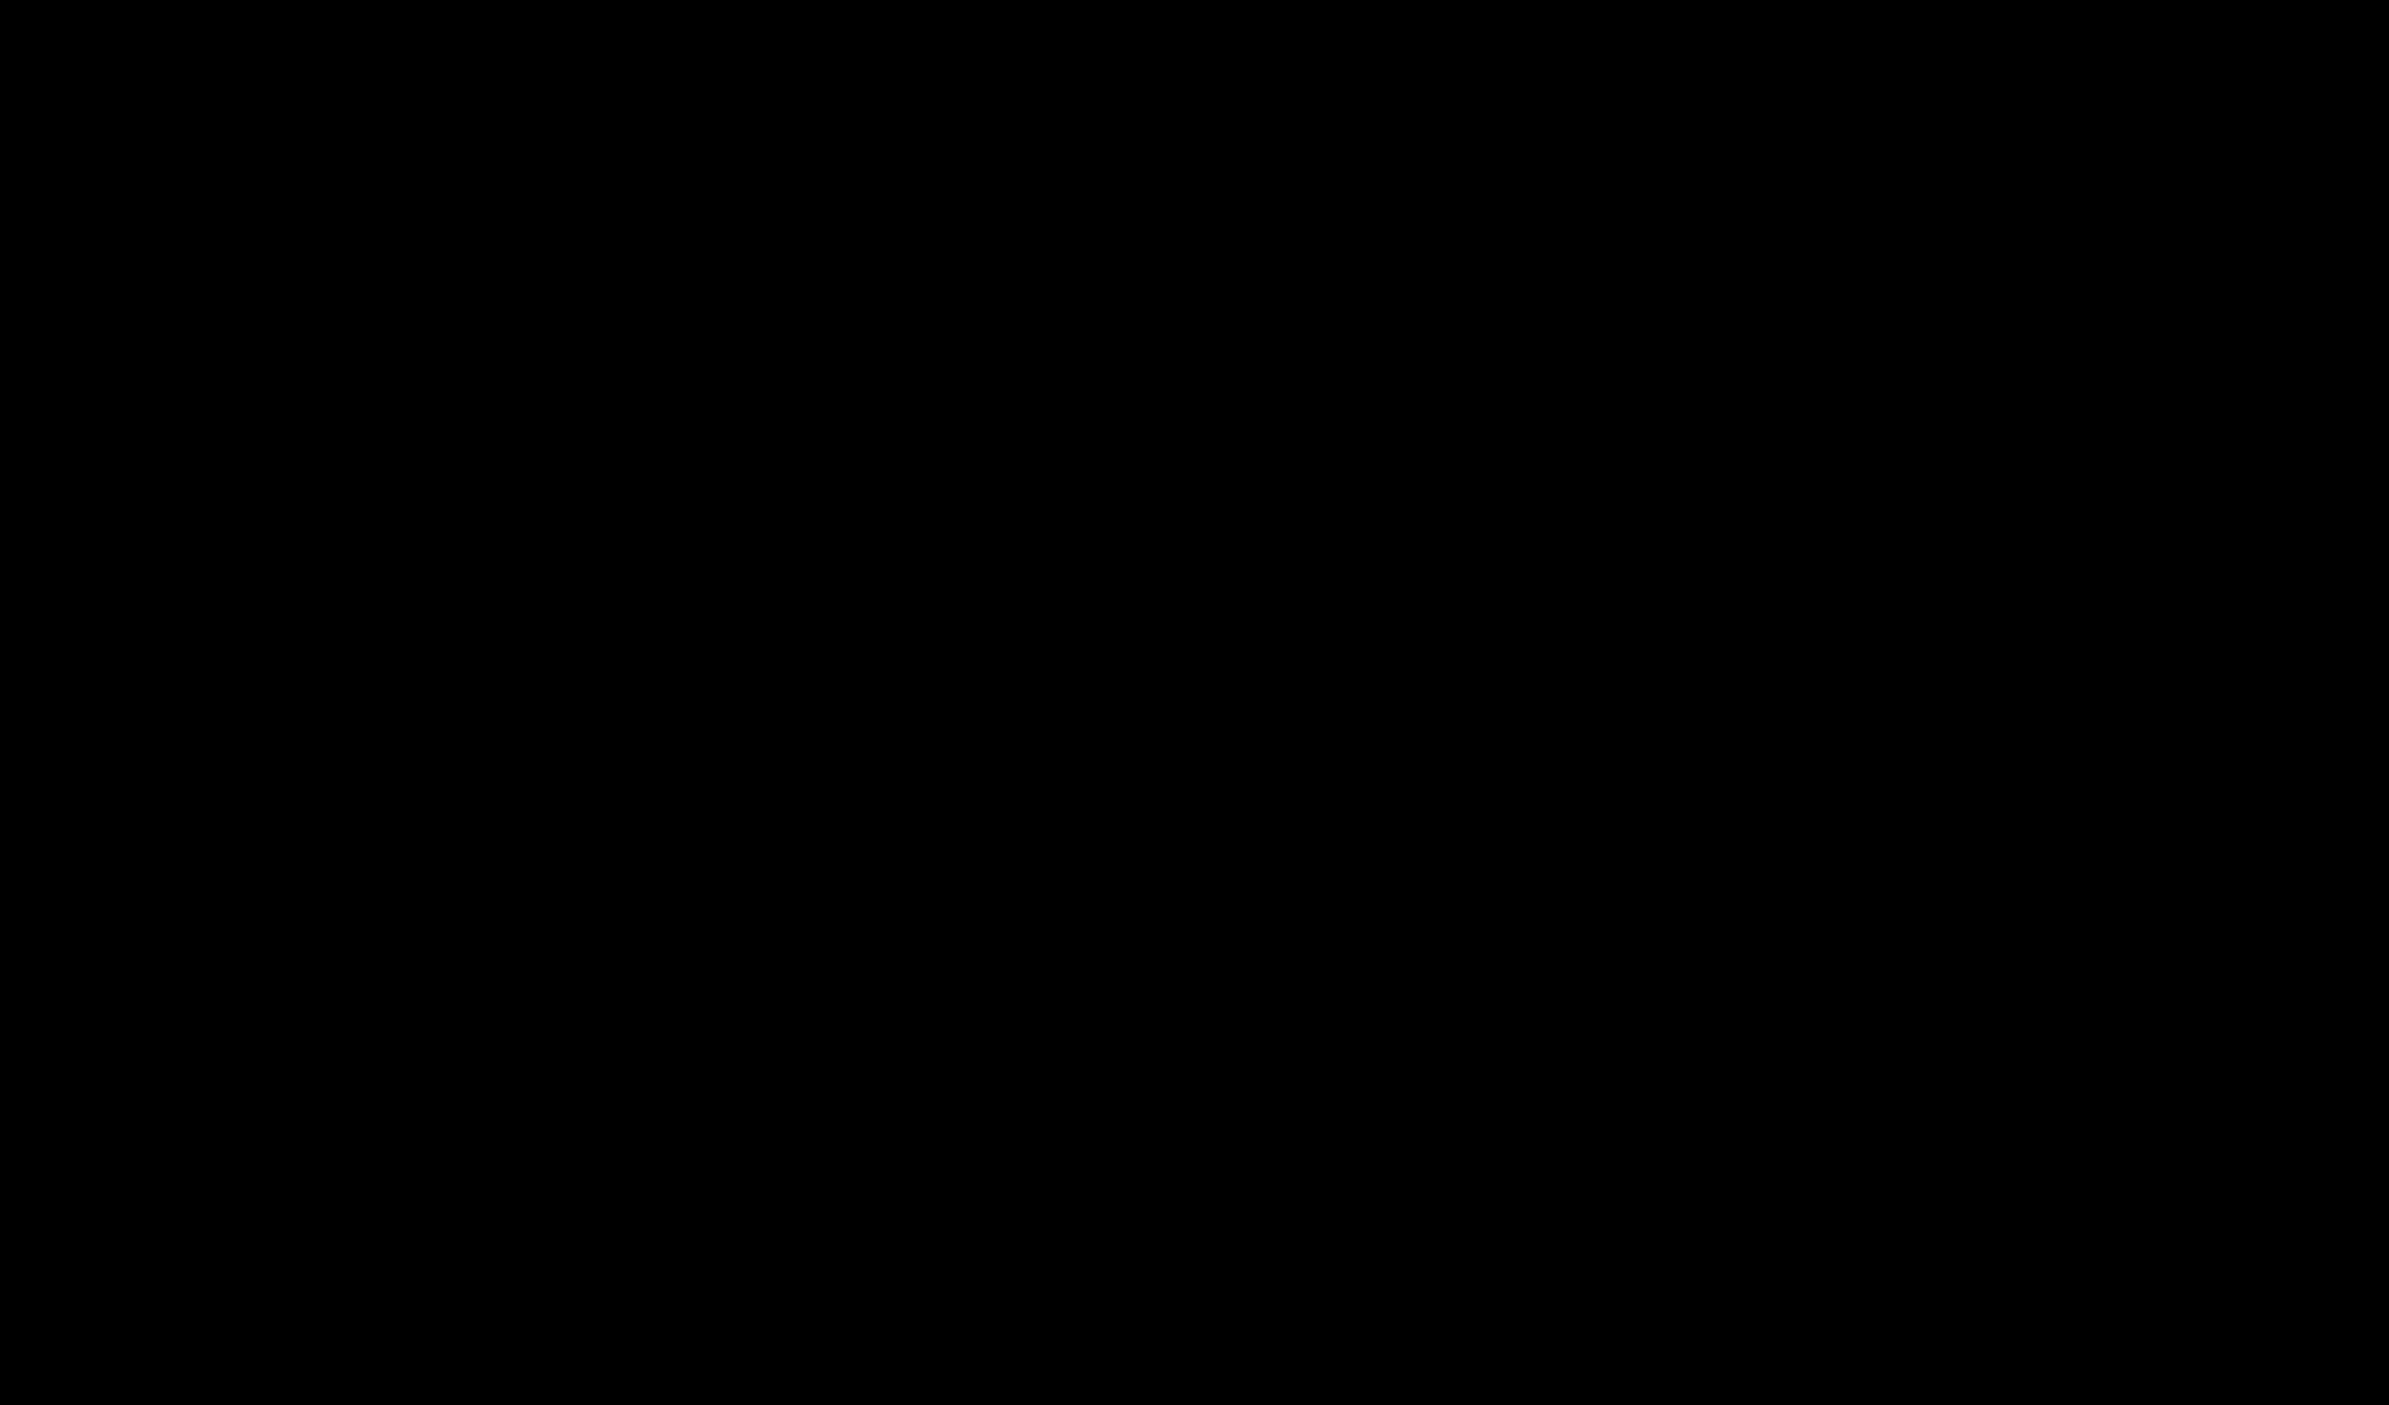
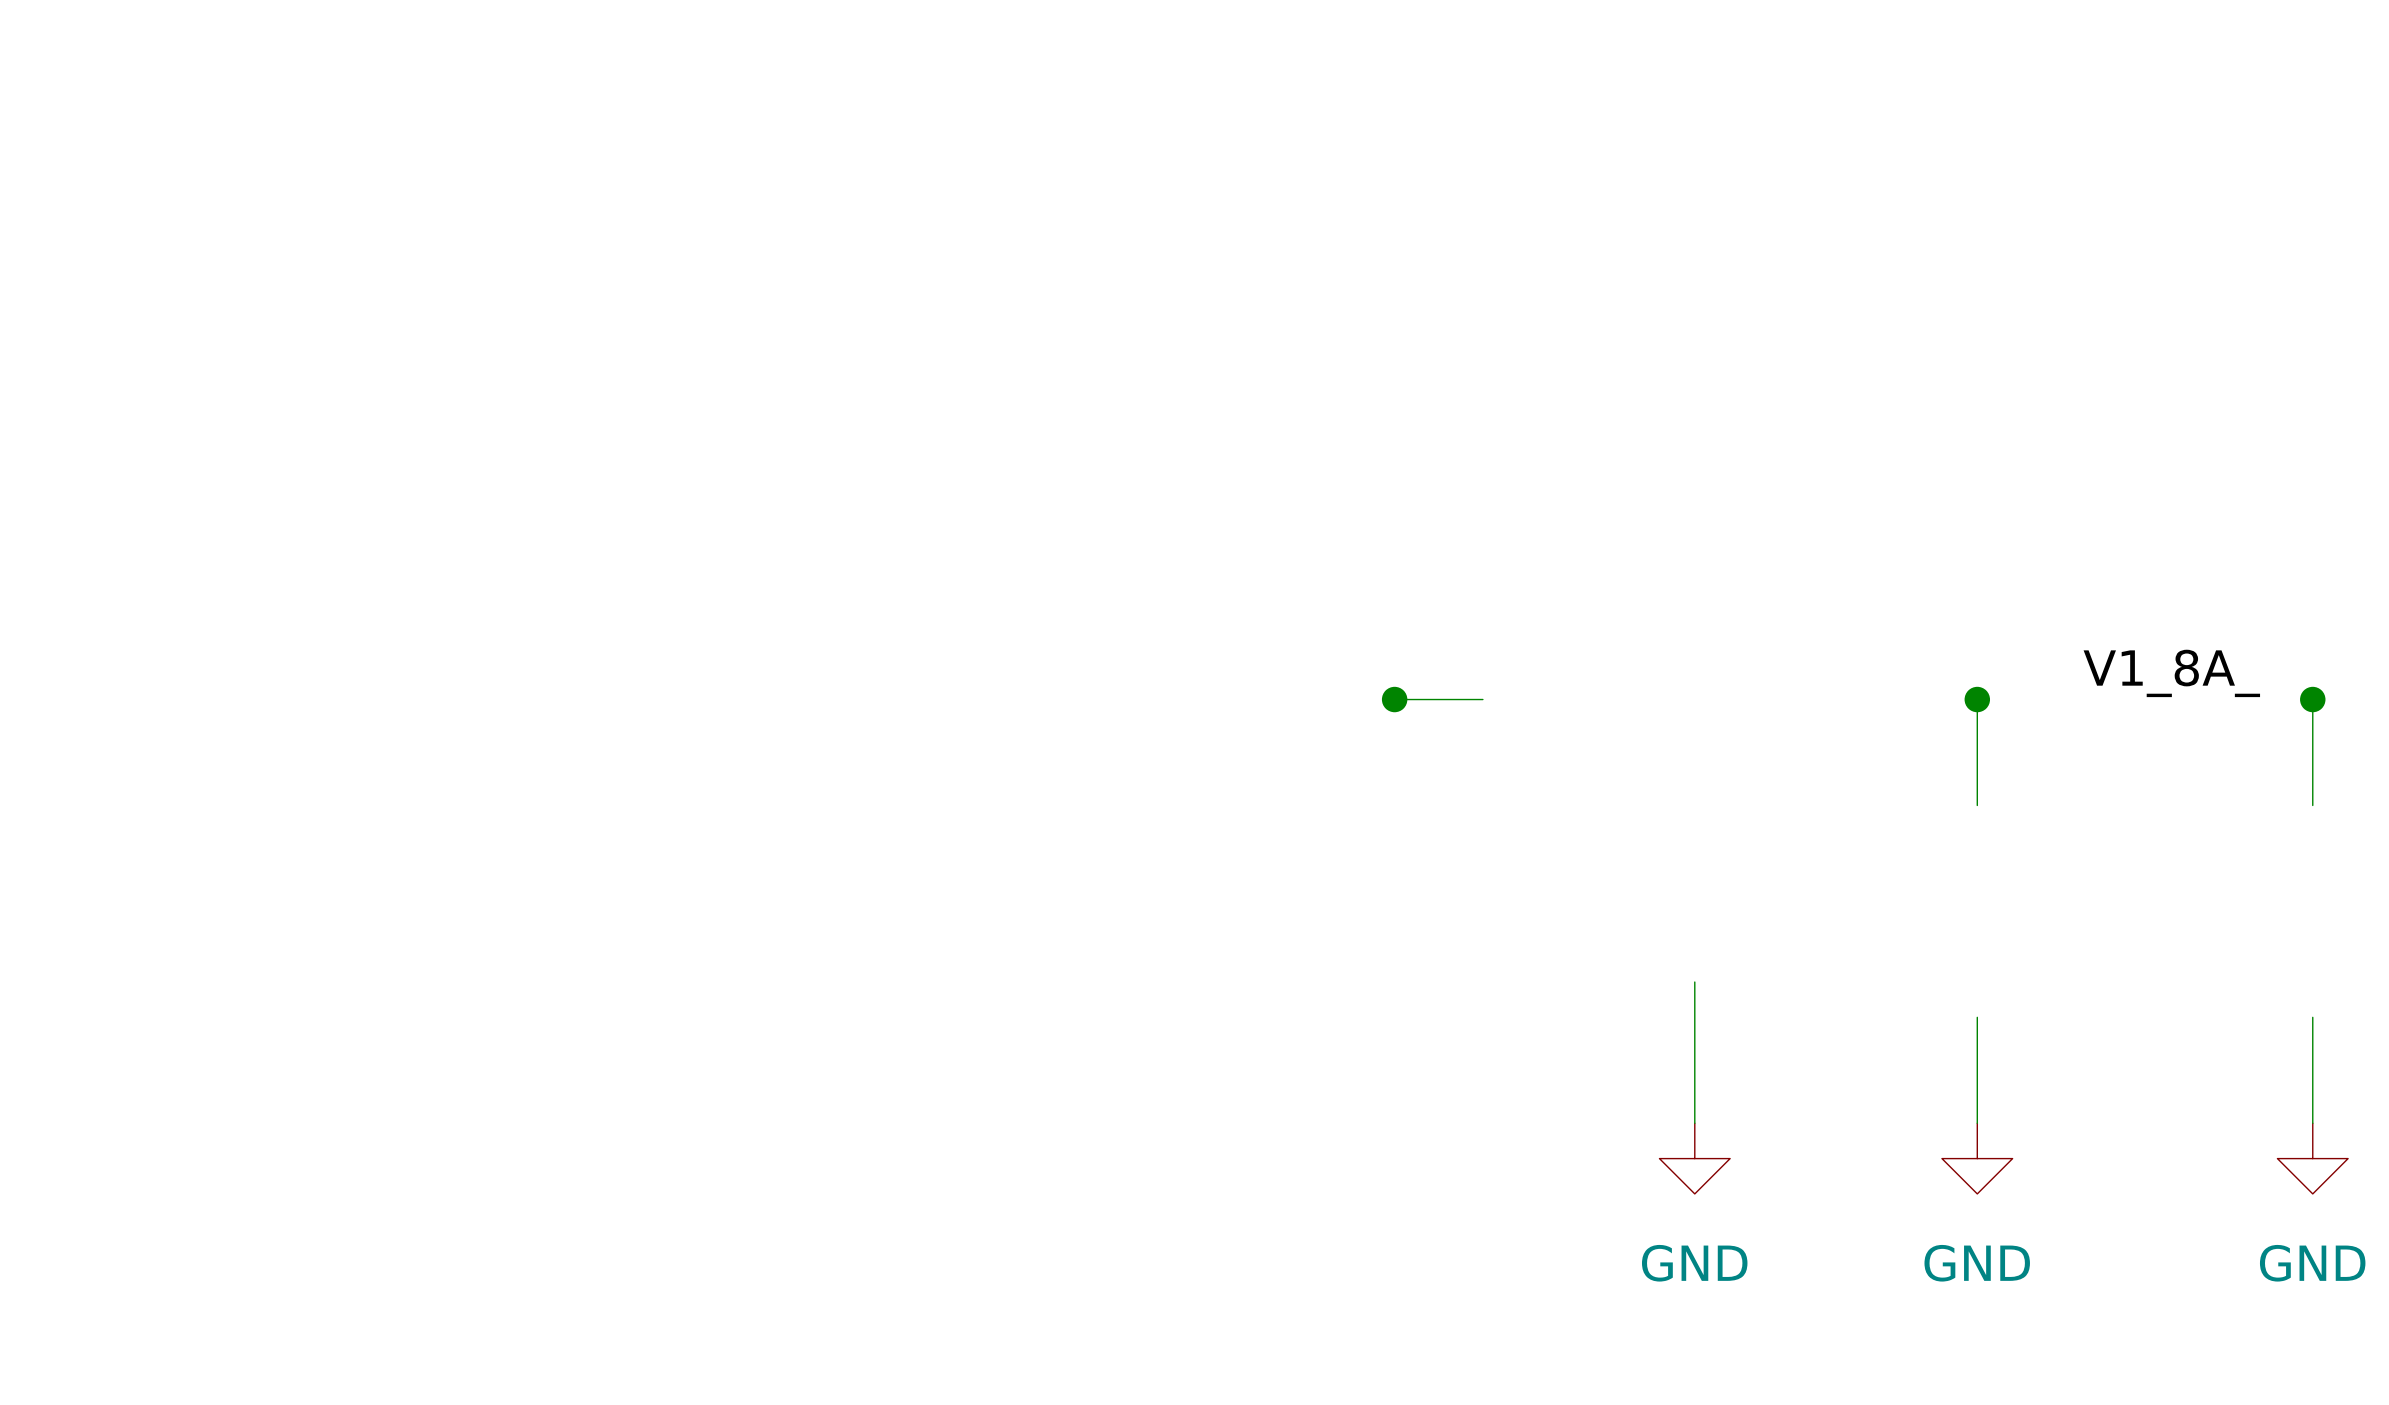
label: none -> V1_8A_ (2171, 673)
wire: none -> (1394, 699) (1482, 699)
junction: none -> (1394, 699)
wire: none -> (1977, 699) (1977, 805)
junction: none -> (1977, 699)
wire: none -> (2312, 699) (2312, 805)
junction: none -> (2312, 699)
wire: none -> (1694, 982) (1694, 1123)
wire: none -> (1977, 1017) (1977, 1123)
wire: none -> (2312, 1017) (2312, 1123)
power symbol: none -> GND (1694, 1158)
power symbol: none -> GND (1977, 1158)
power symbol: none -> GND (2312, 1158)

